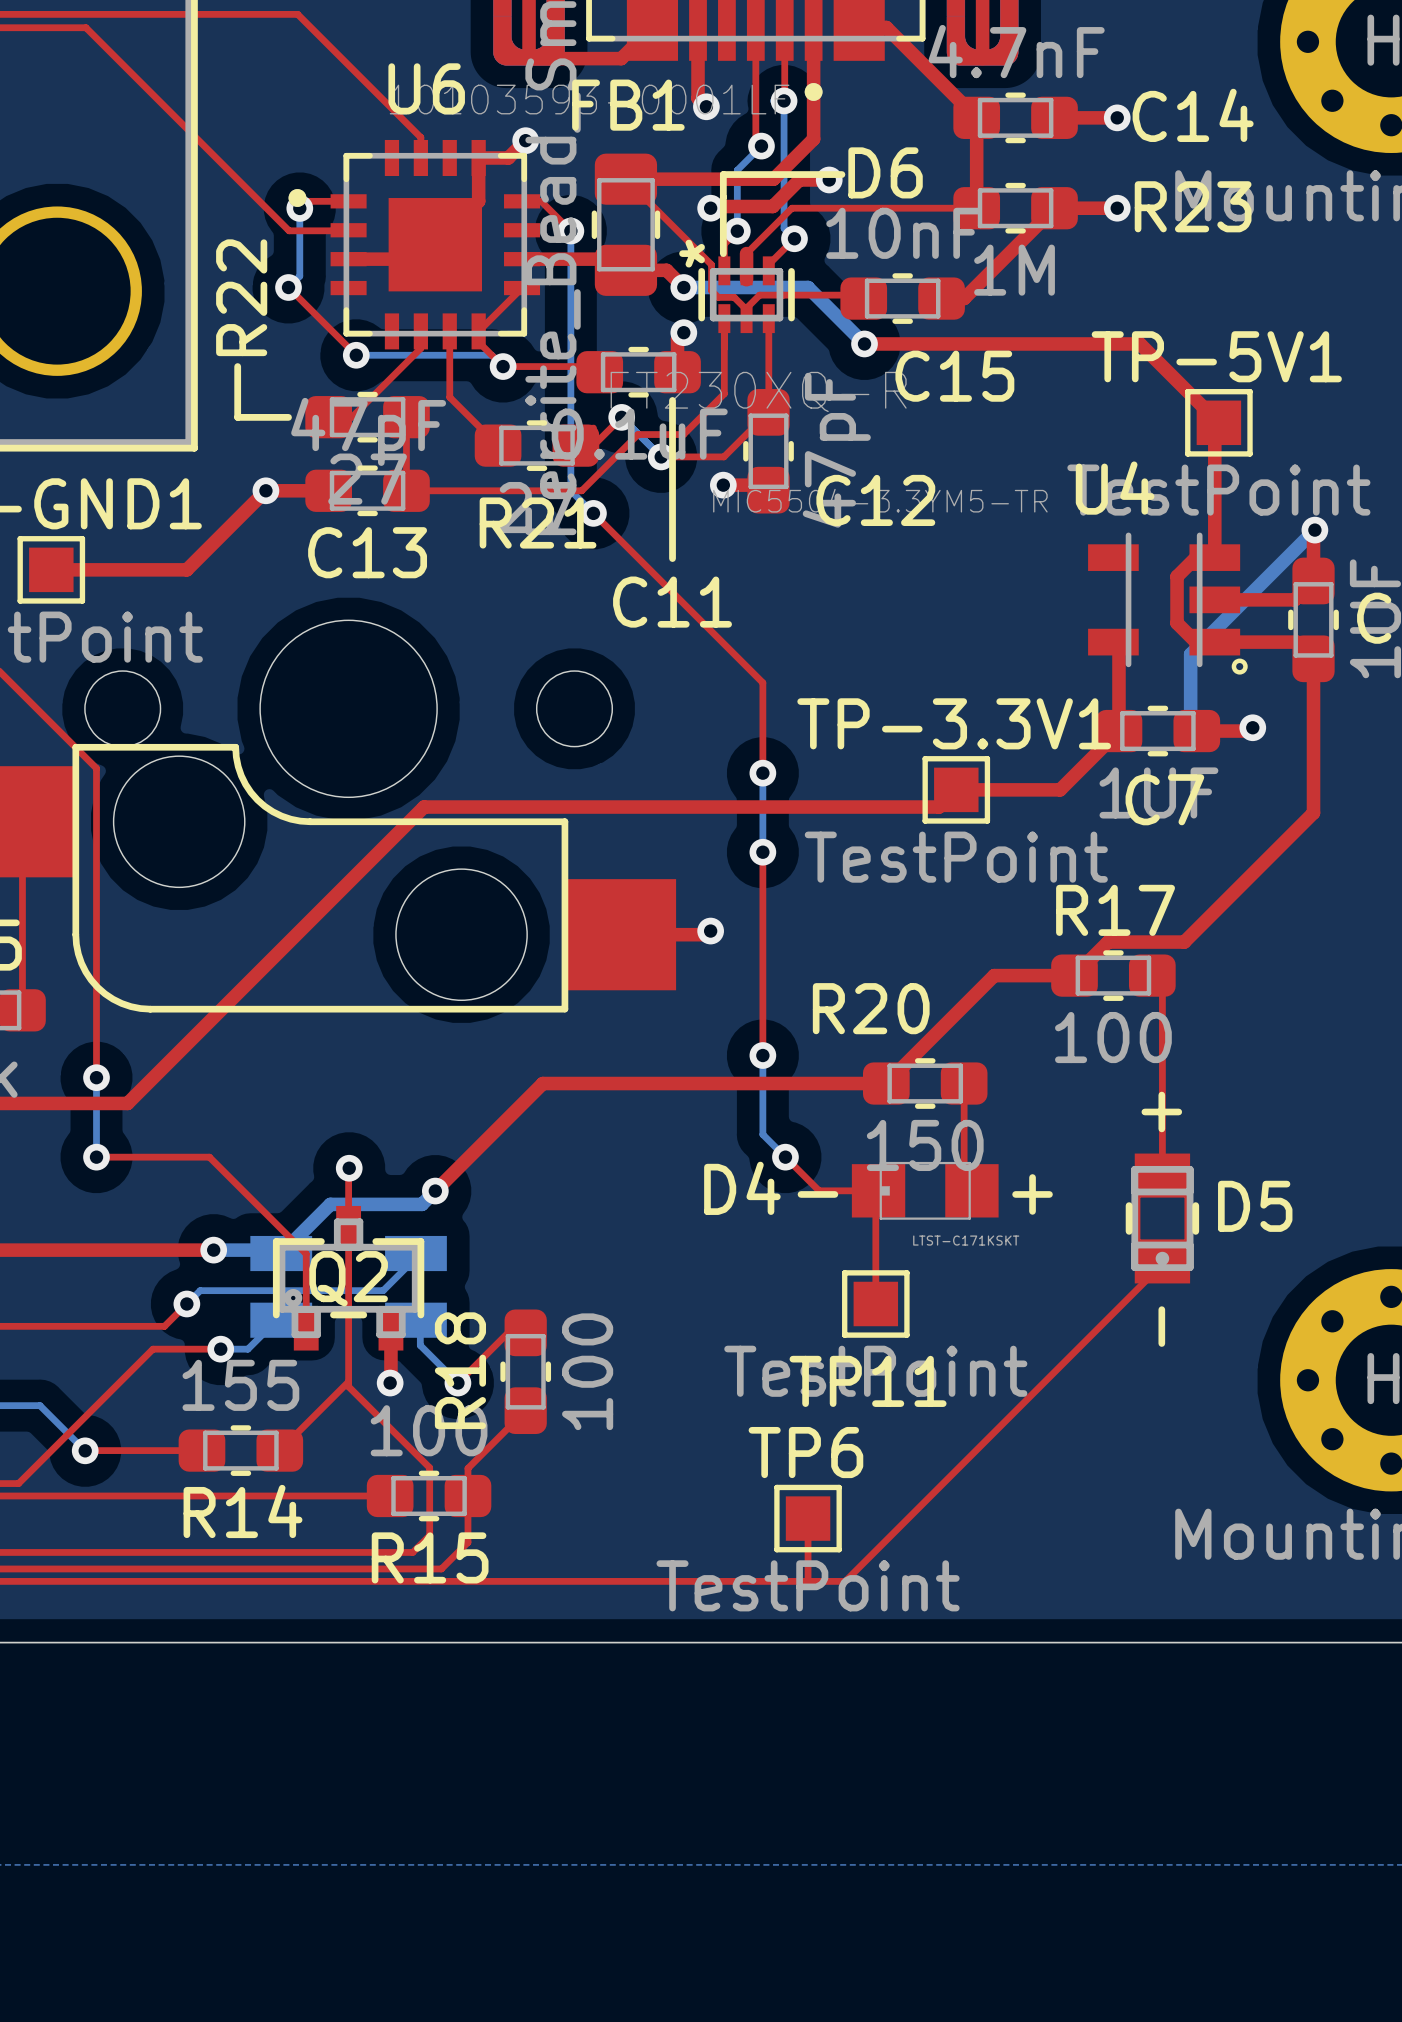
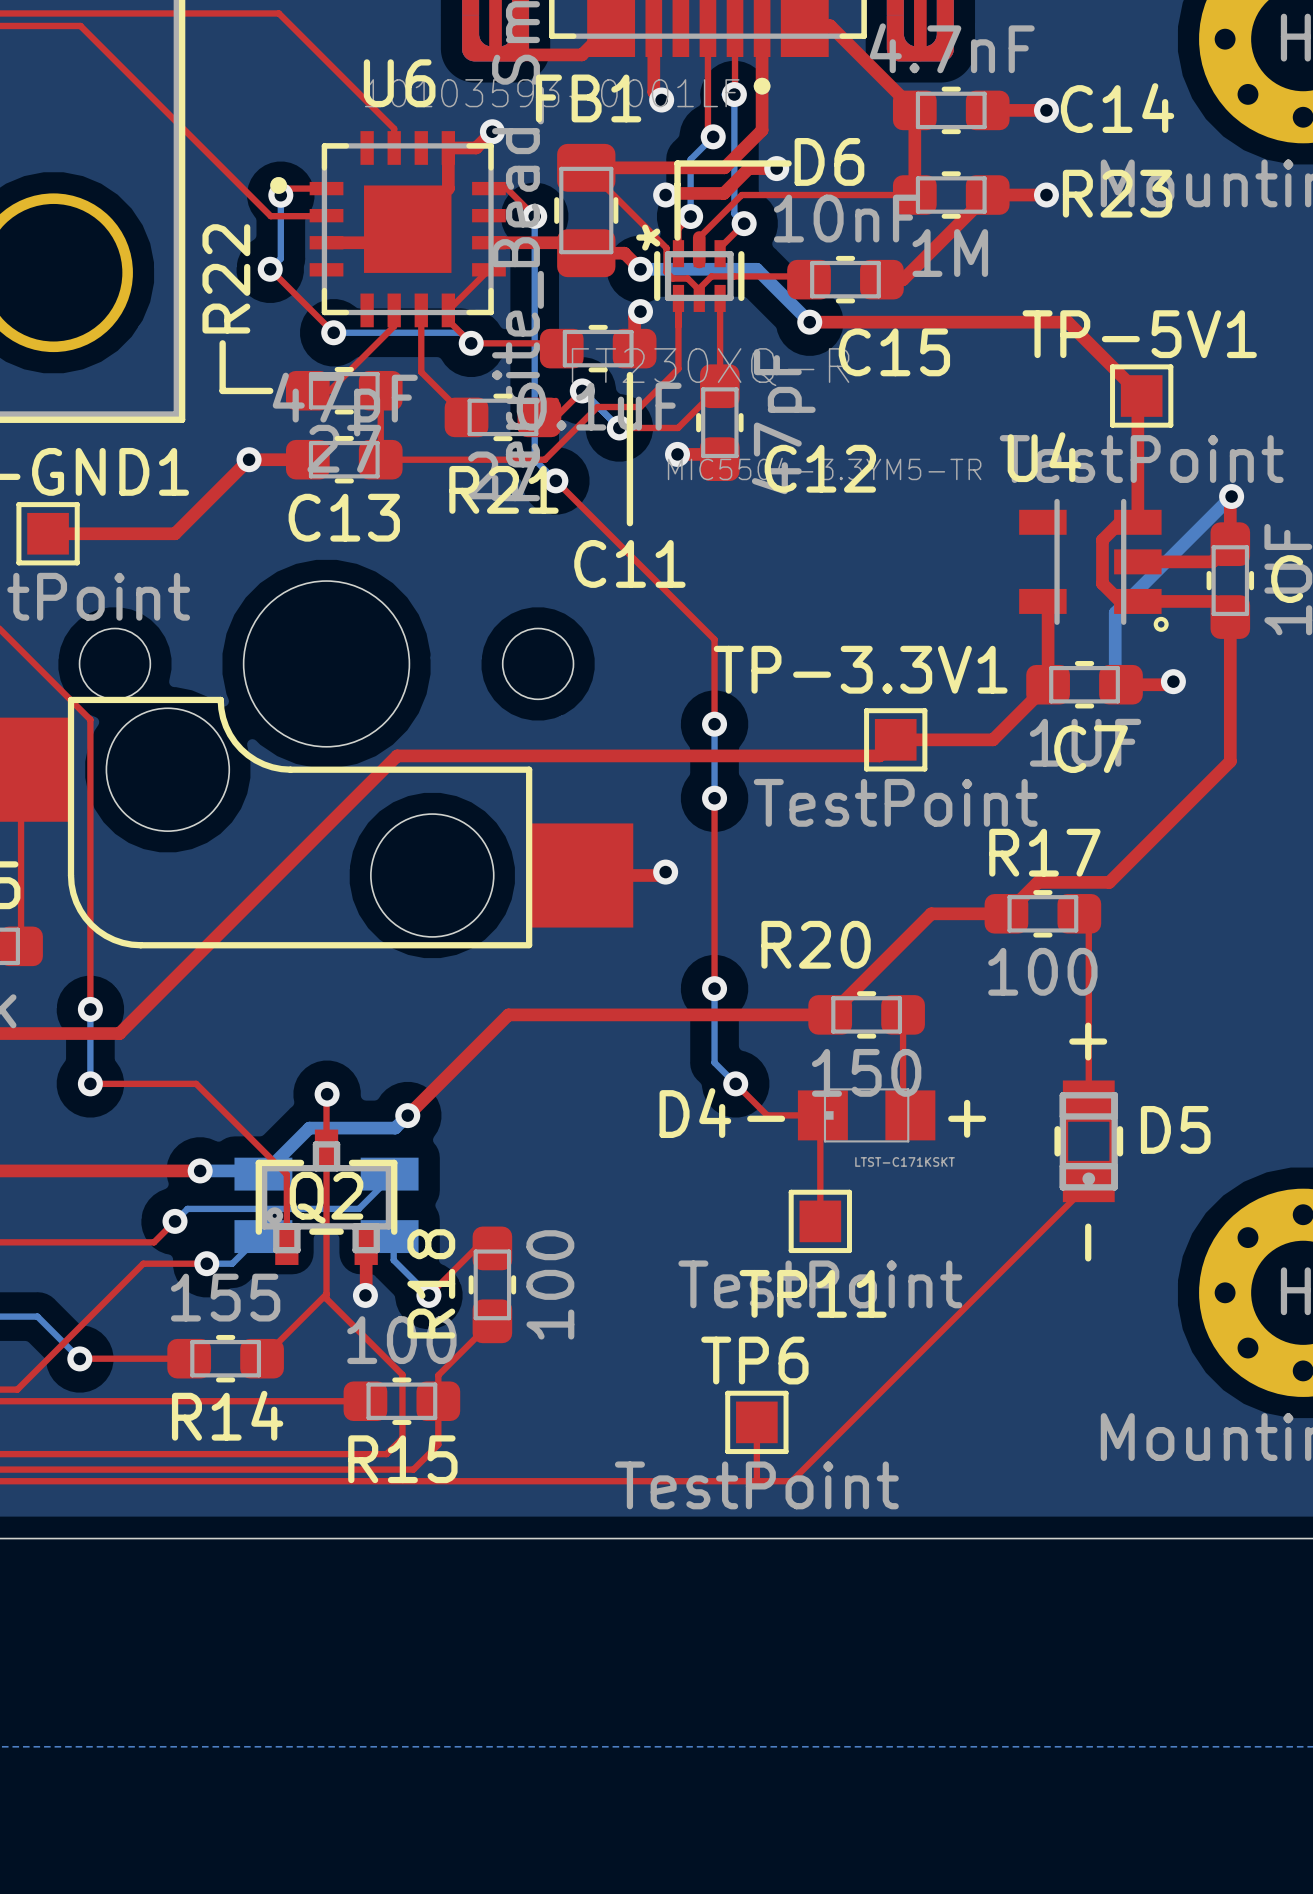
TP-3.3V1 name position: TP-3.3V1 (954, 723) -> TP-3.3V1 (860, 669)

